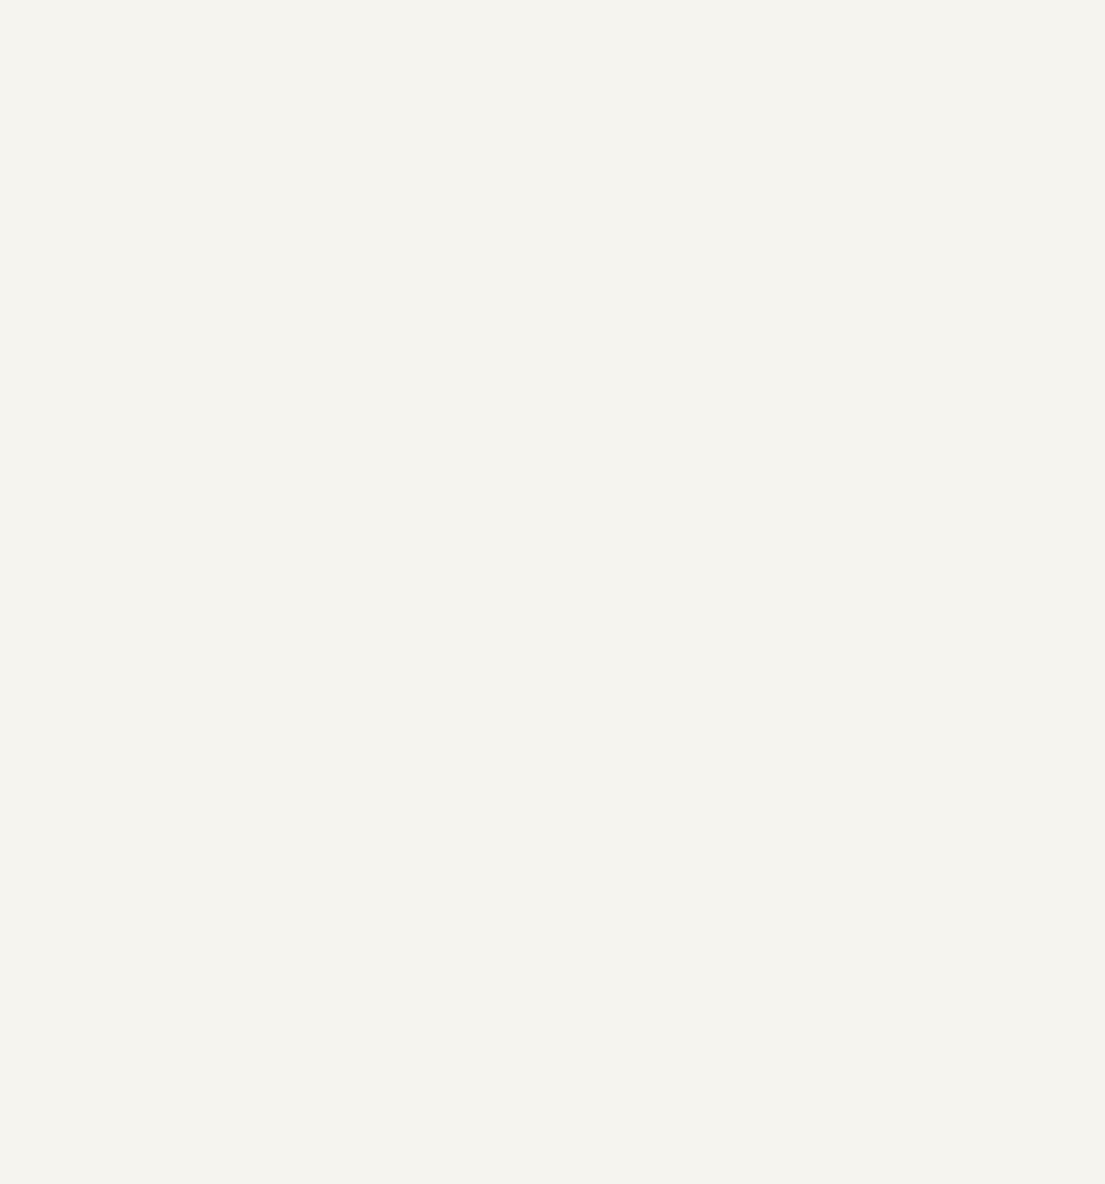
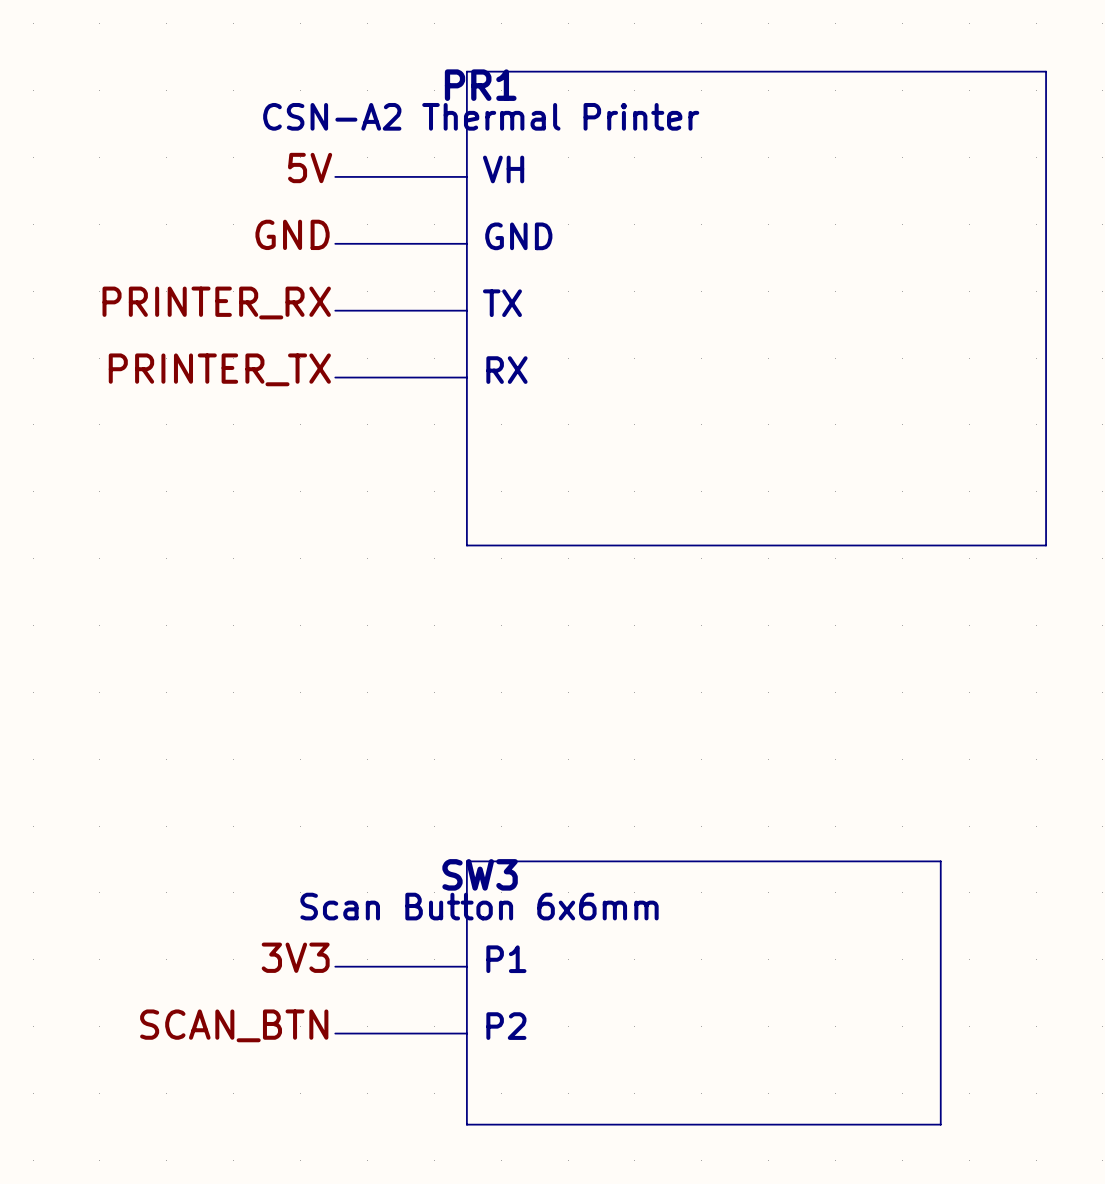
wire: none -> (466, 71) (1046, 71) (1046, 545) (466, 545) (466, 71)
text: none -> PR1 (480, 85)
text: none -> CSN-A2 Thermal Printer (481, 116)
label: none -> 5V (310, 168)
text: none -> VH (503, 169)
wire: none -> (335, 176) (466, 176)
label: none -> GND (292, 234)
text: none -> GND (518, 236)
wire: none -> (335, 243) (466, 243)
text: none -> TX (502, 303)
label: none -> PRINTER_RX (216, 302)
wire: none -> (335, 310) (466, 310)
text: none -> RX (506, 370)
label: none -> PRINTER_TX (219, 369)
wire: none -> (335, 377) (466, 377)
wire: none -> (466, 861) (466, 1124) (940, 1124) (940, 861) (466, 861)
text: none -> SW3 (480, 874)
text: none -> Scan Button 6x6mm (479, 906)
label: none -> 3V3 (295, 957)
text: none -> P1 (506, 959)
wire: none -> (335, 966) (466, 966)
text: none -> P2 (506, 1026)
label: none -> SCAN_BTN (234, 1025)
wire: none -> (335, 1033) (466, 1033)

